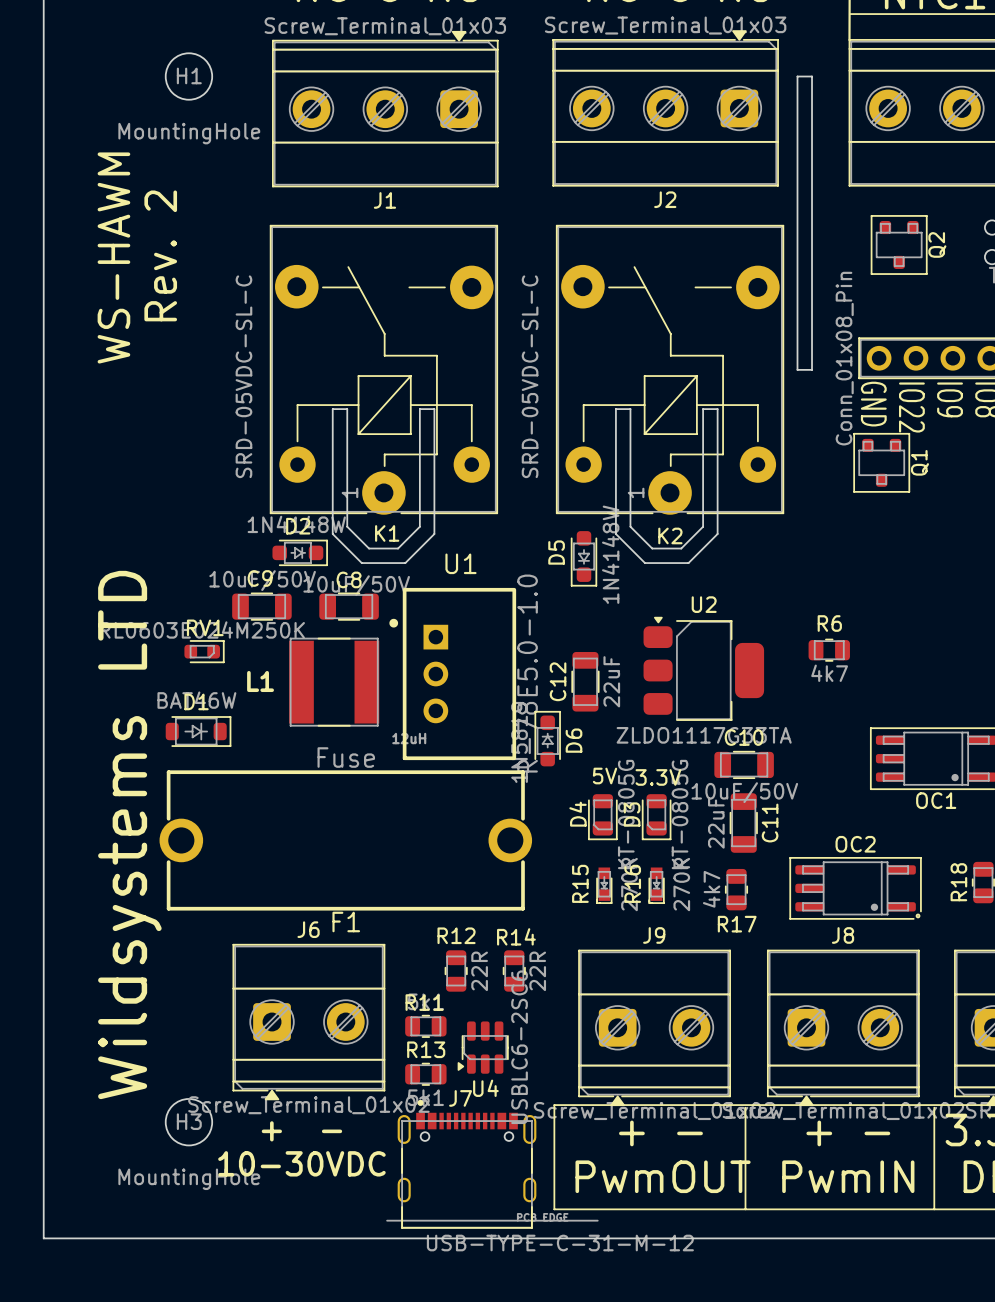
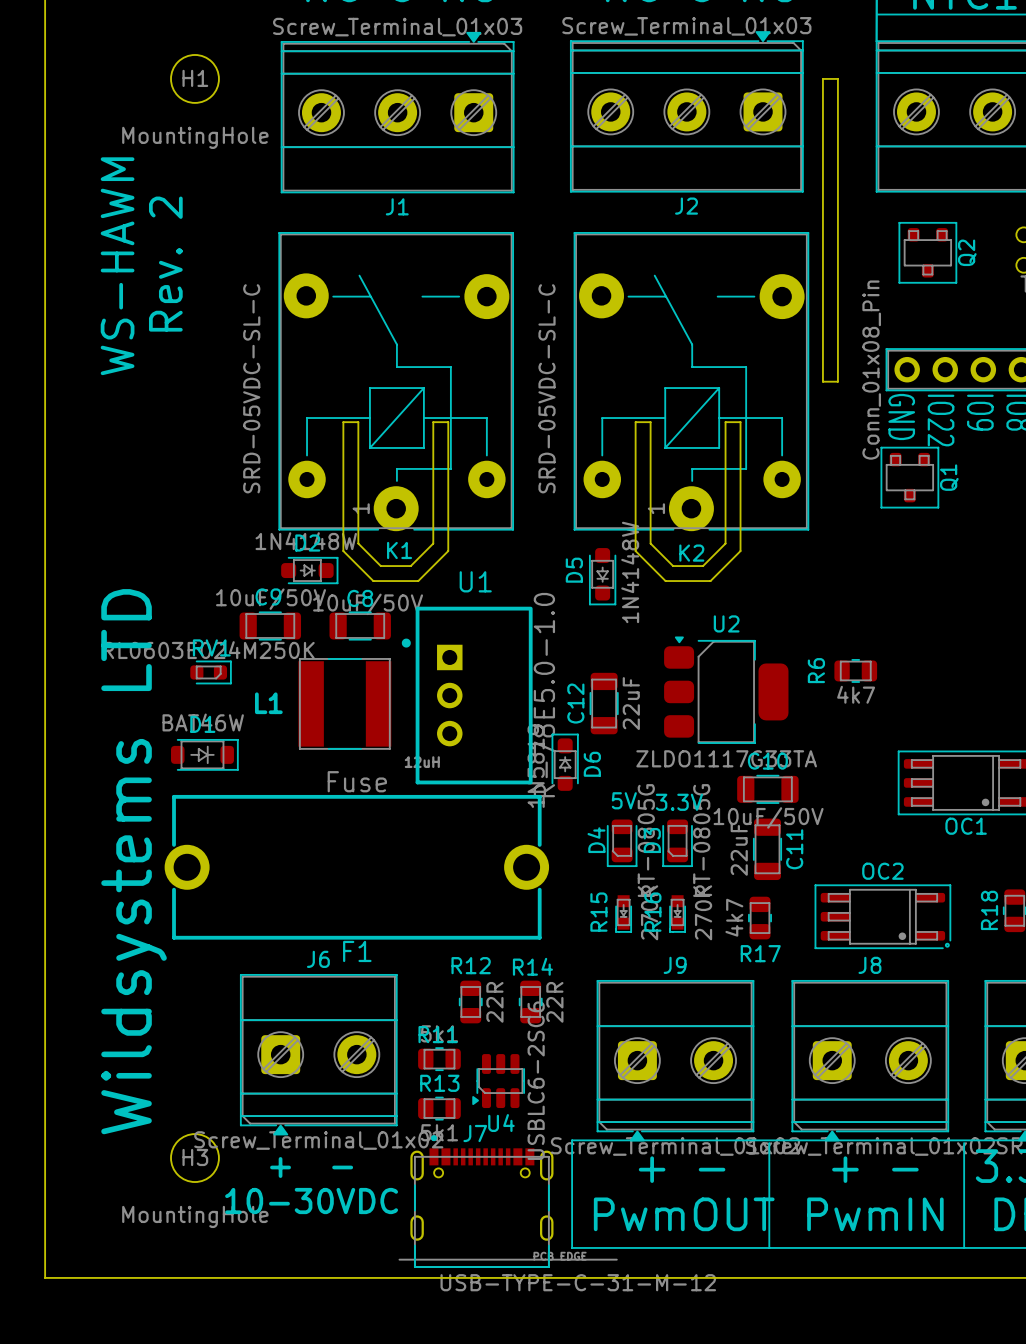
R6 name rotation: 0° (829, 623) -> 90° counterclockwise (816, 670)
R6 name position: R6 (829, 623) -> R6 (816, 670)

